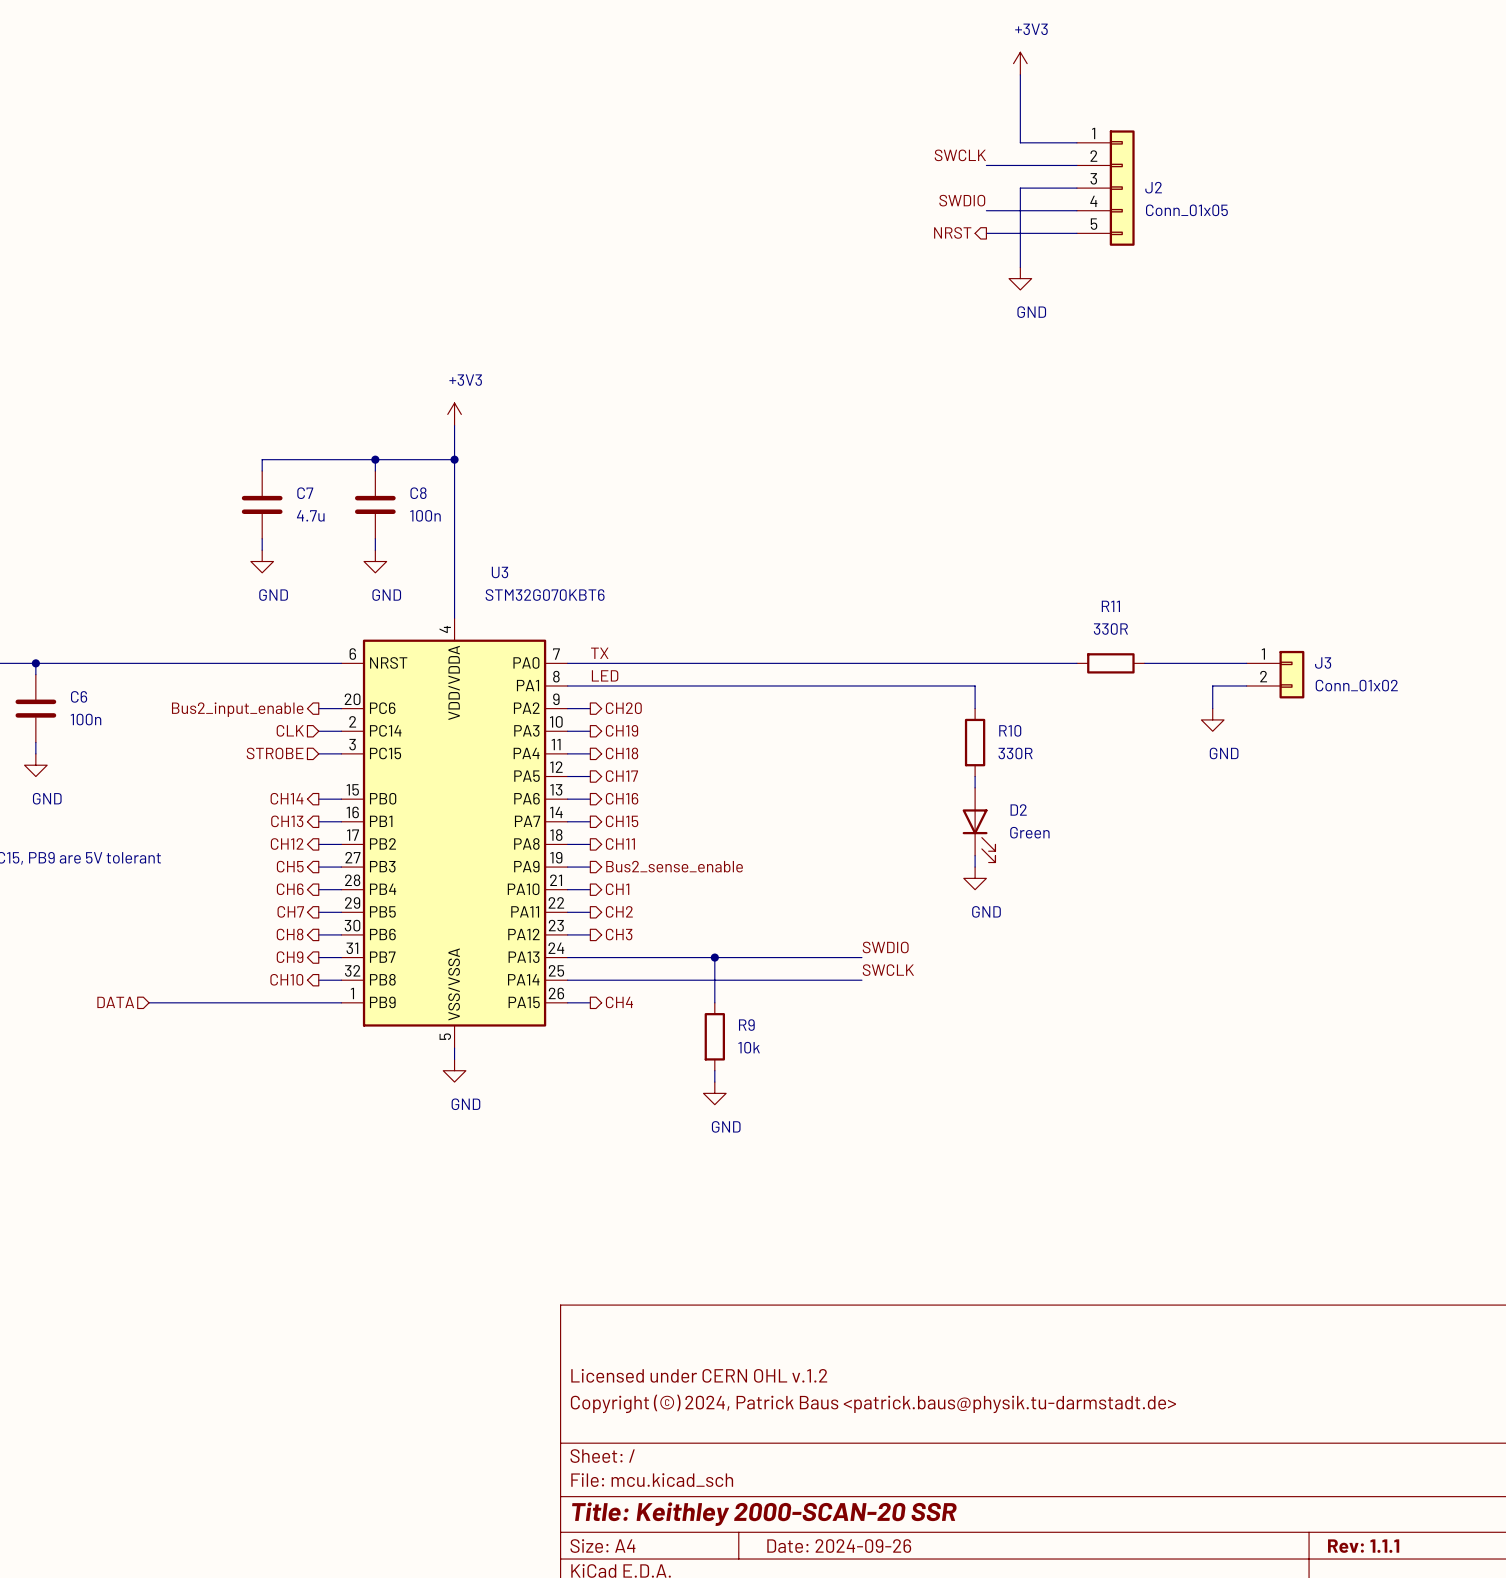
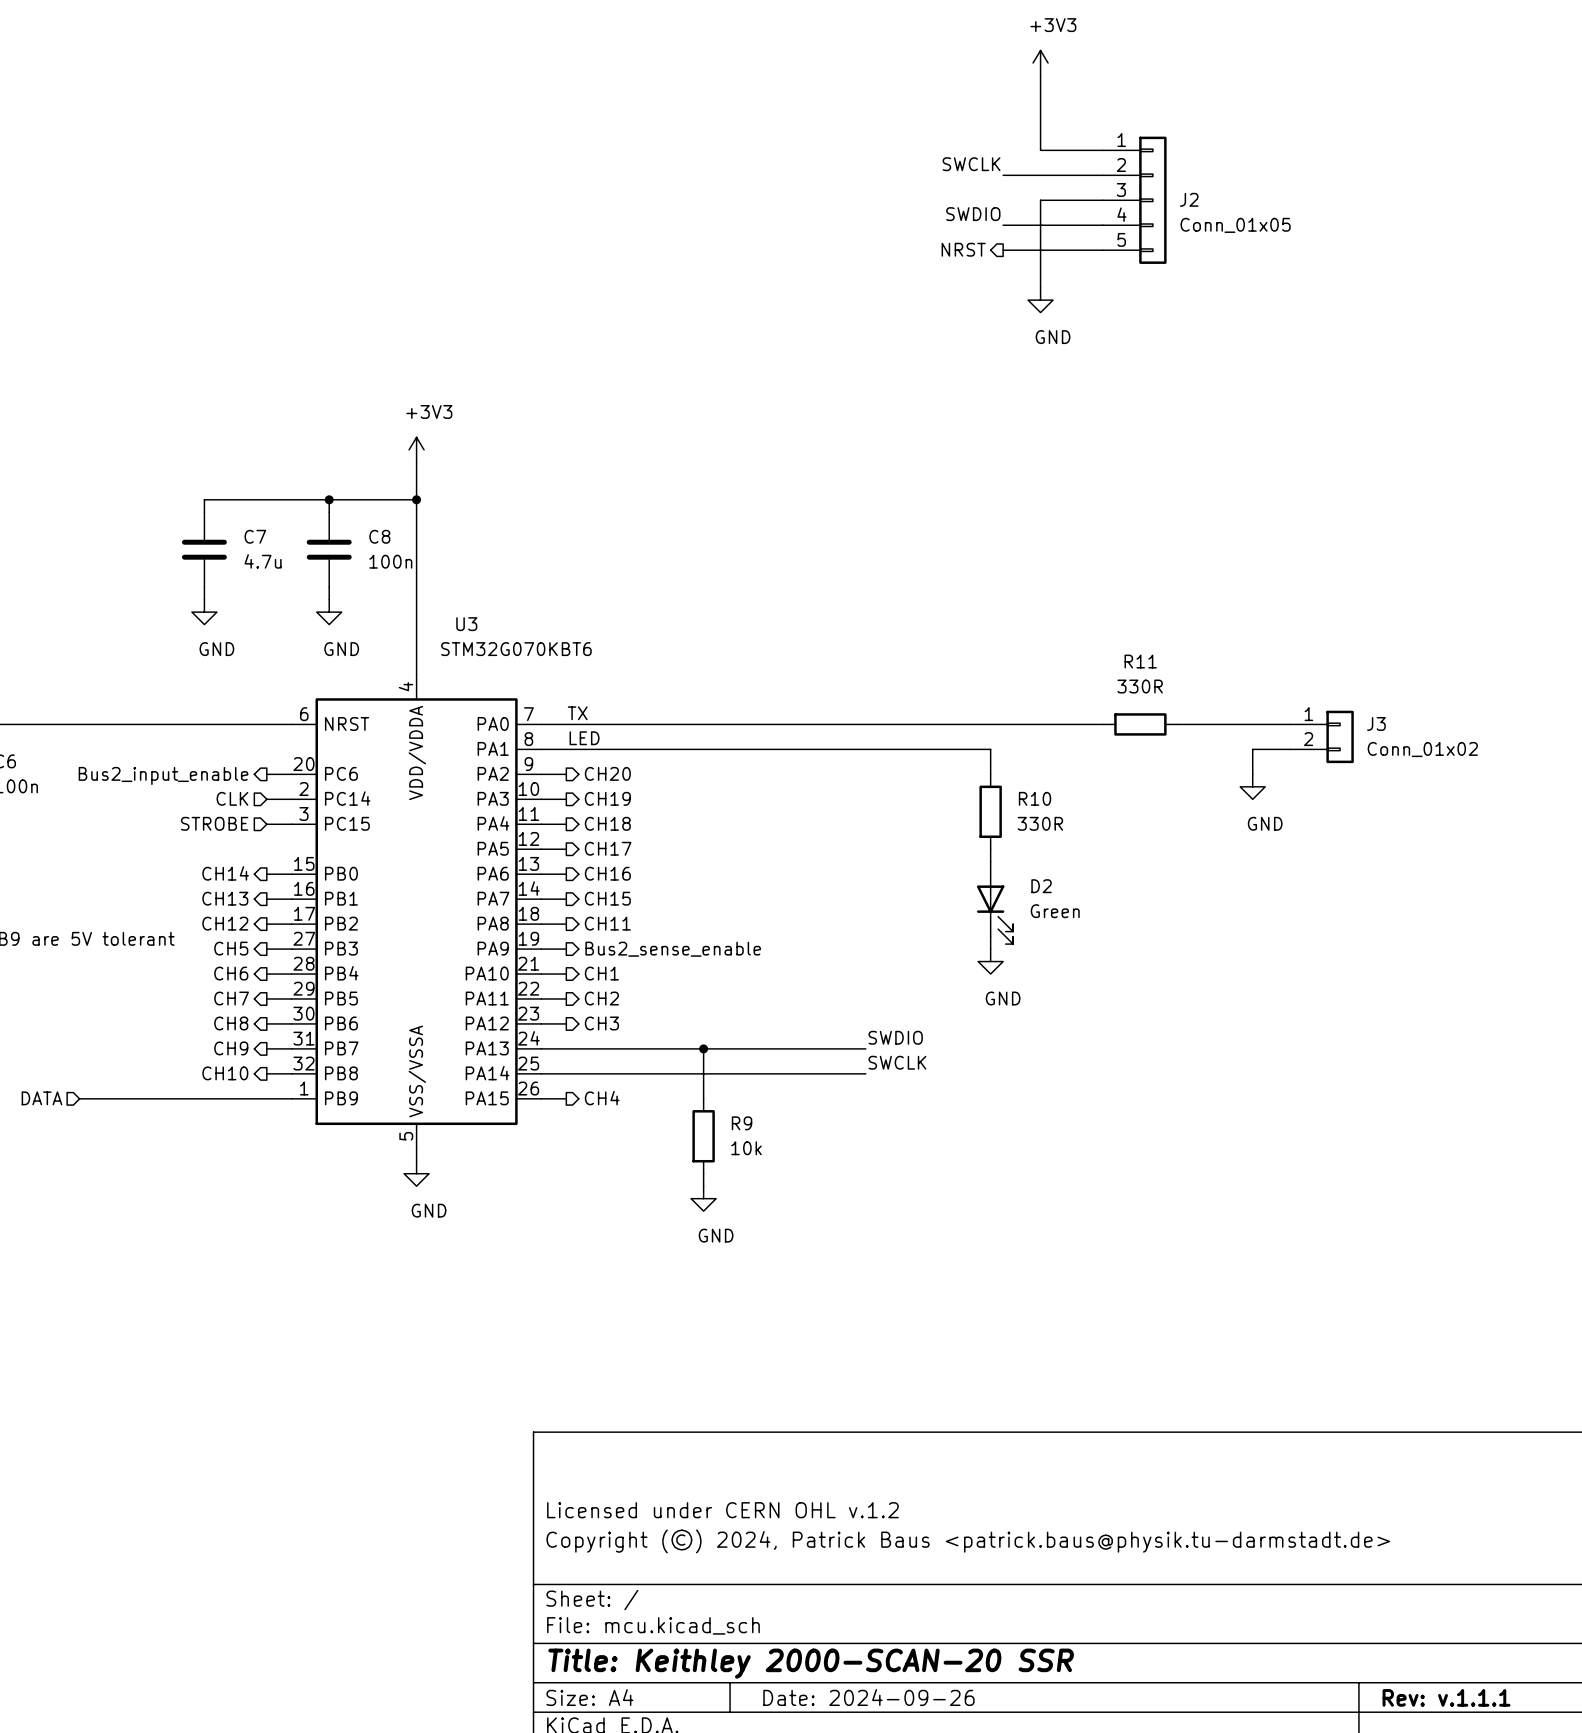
title block: Rev: 1.1.1 (1363, 1546) -> Rev: v.1.1.1 (1446, 1697)

